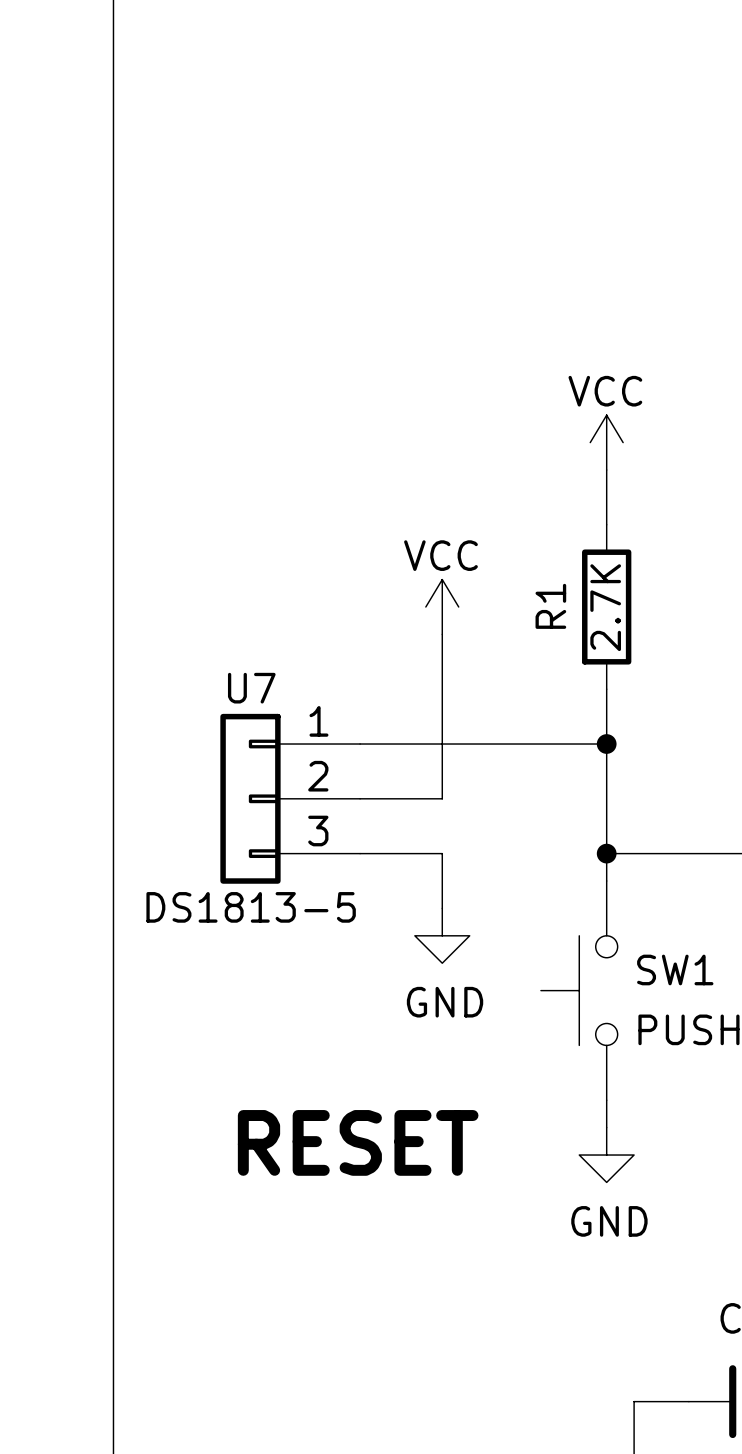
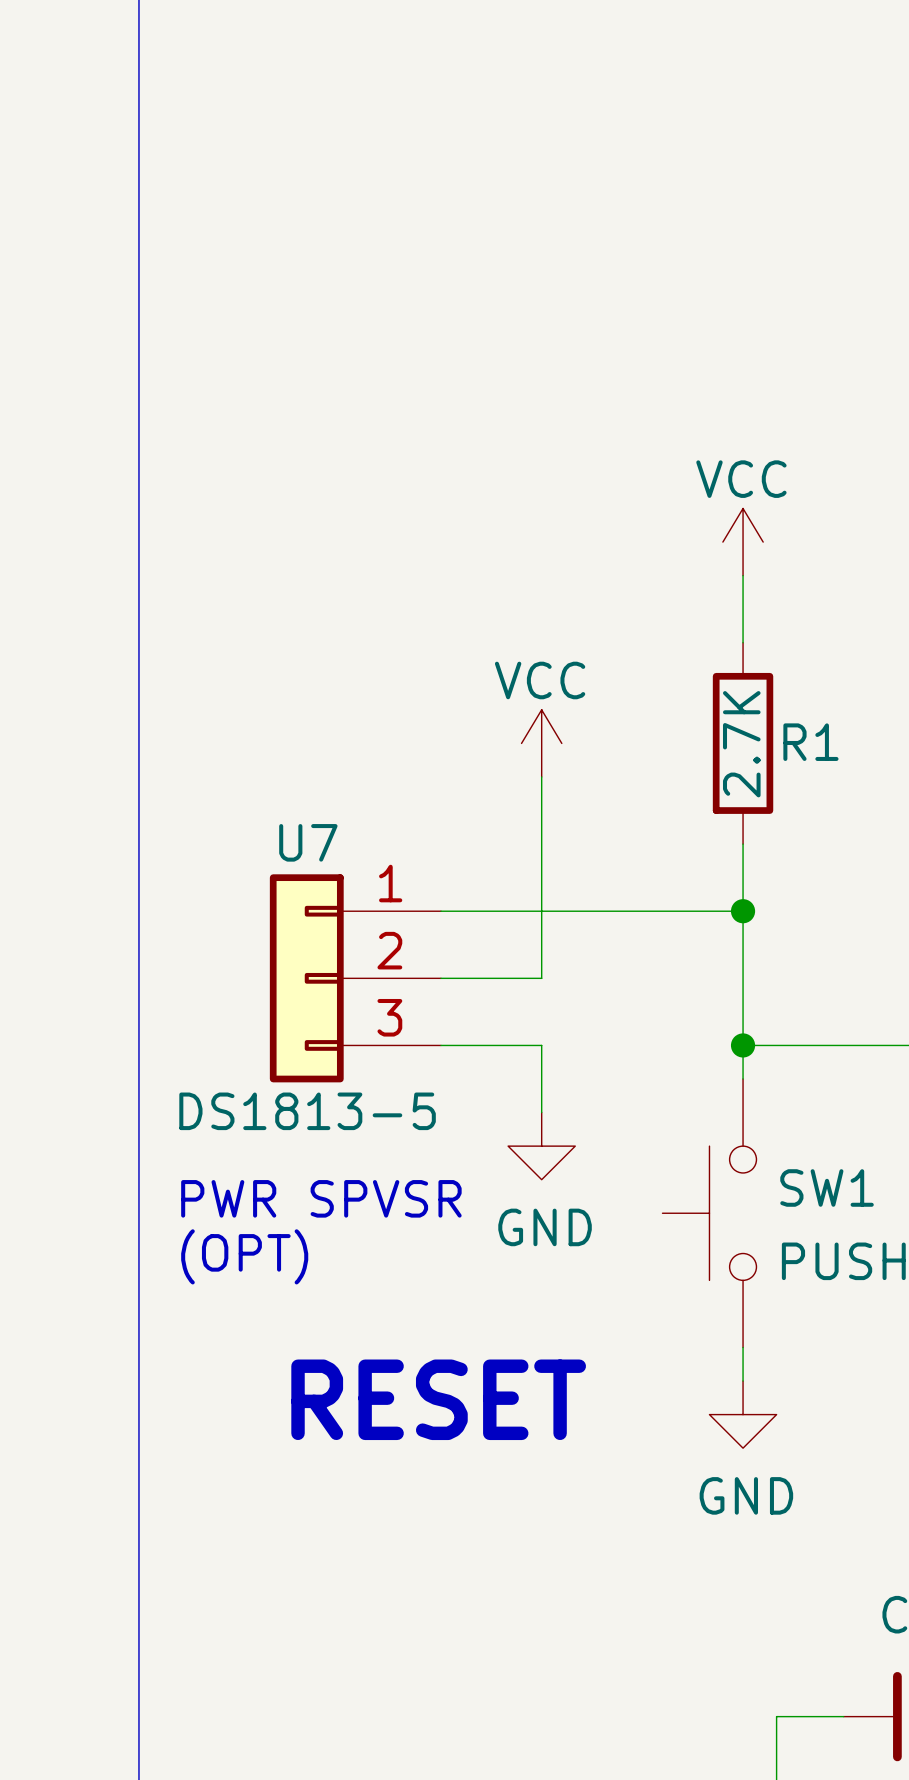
R1 name rotation: 0° (550, 606) -> 90° clockwise (810, 742)
R1 name position: R1 (550, 606) -> R1 (810, 742)
text: none -> PWR SPVSR (321, 1198)
text: none -> (OPT) (244, 1256)

